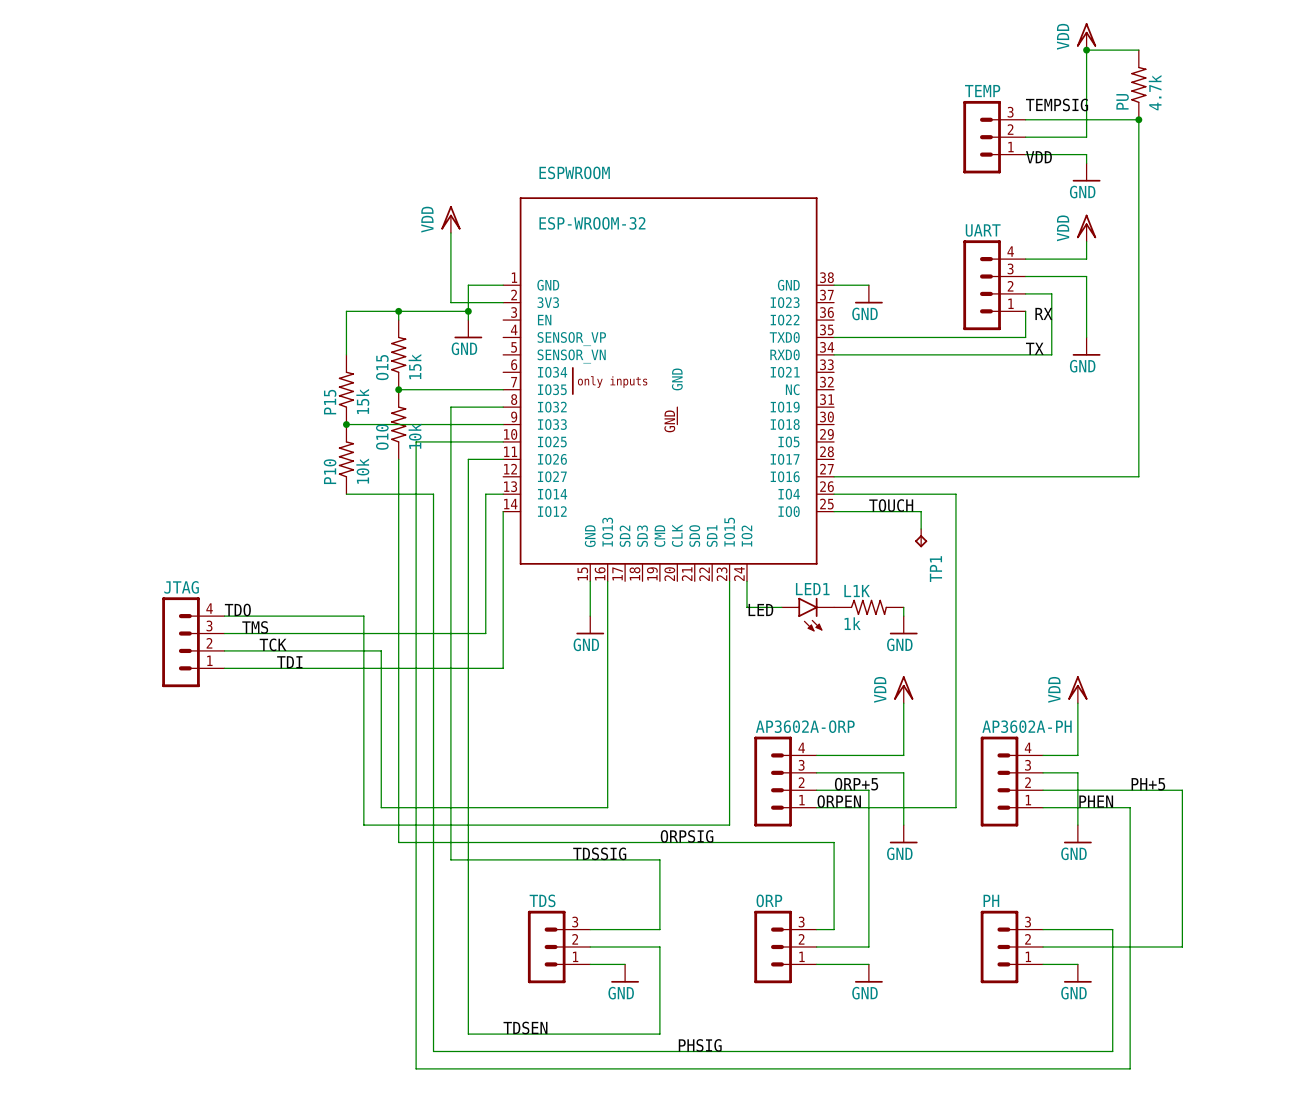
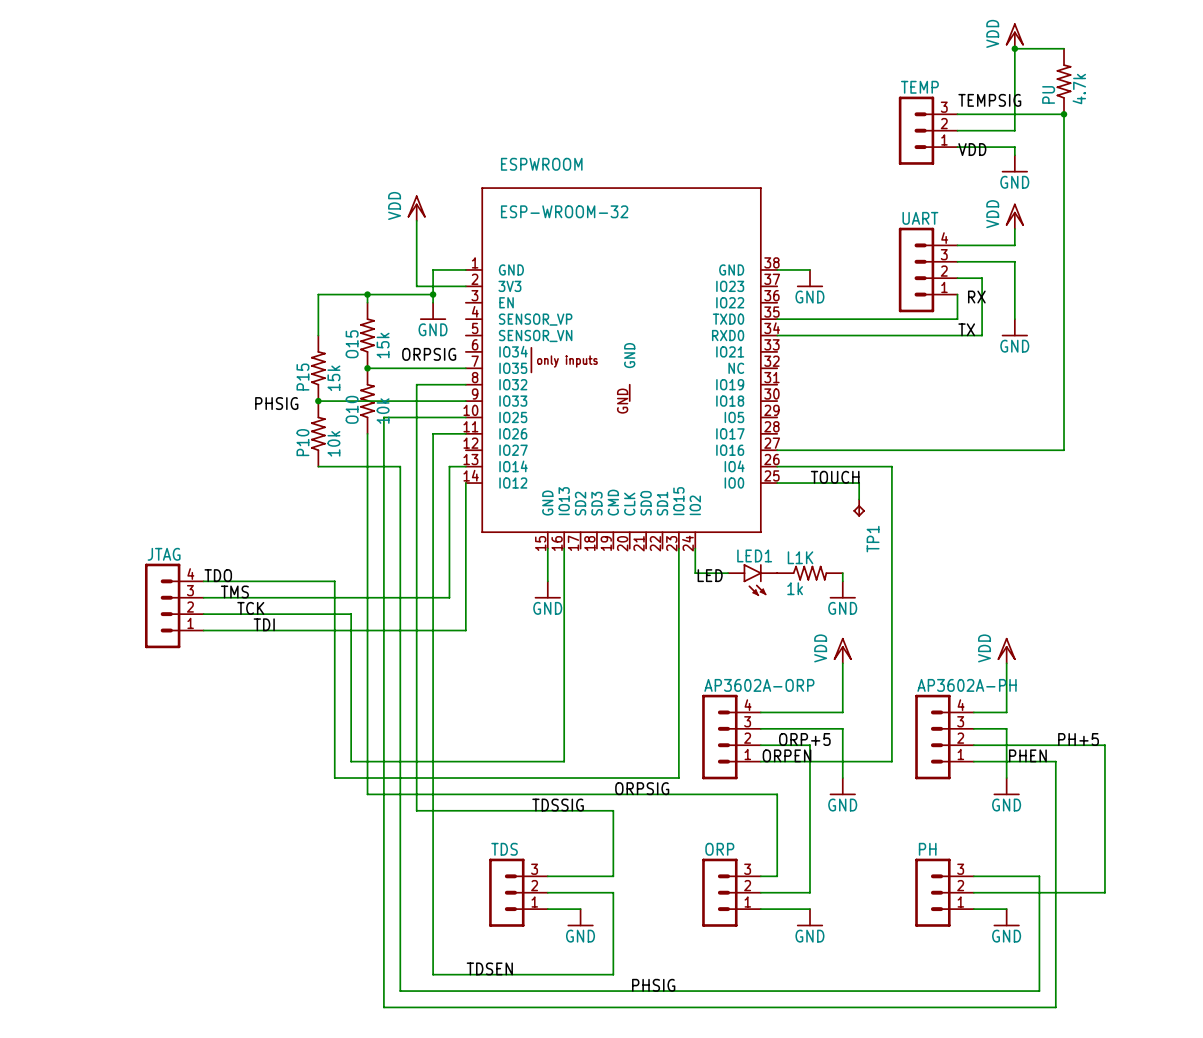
label: none -> ORPSIG (429, 354)
label: none -> PHSIG (276, 403)

